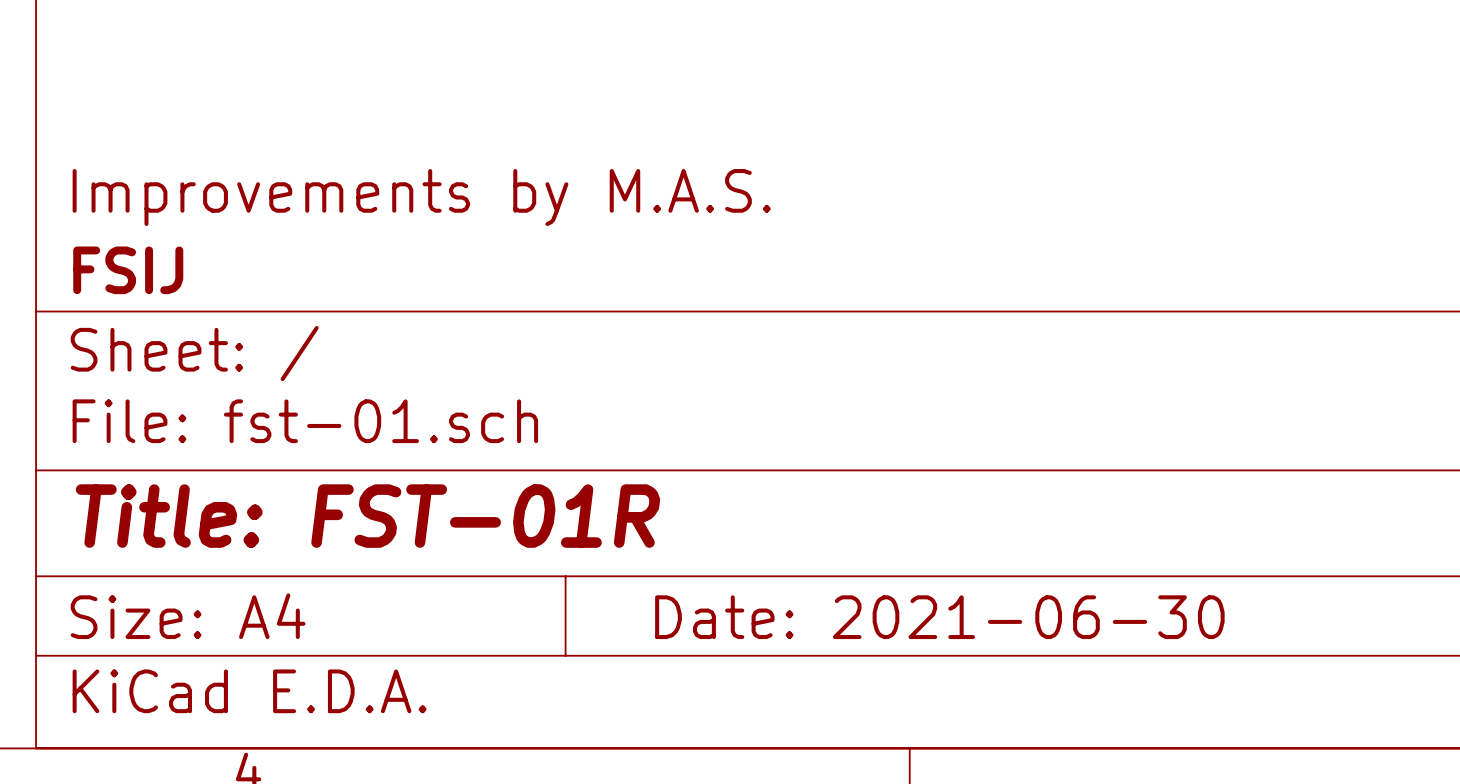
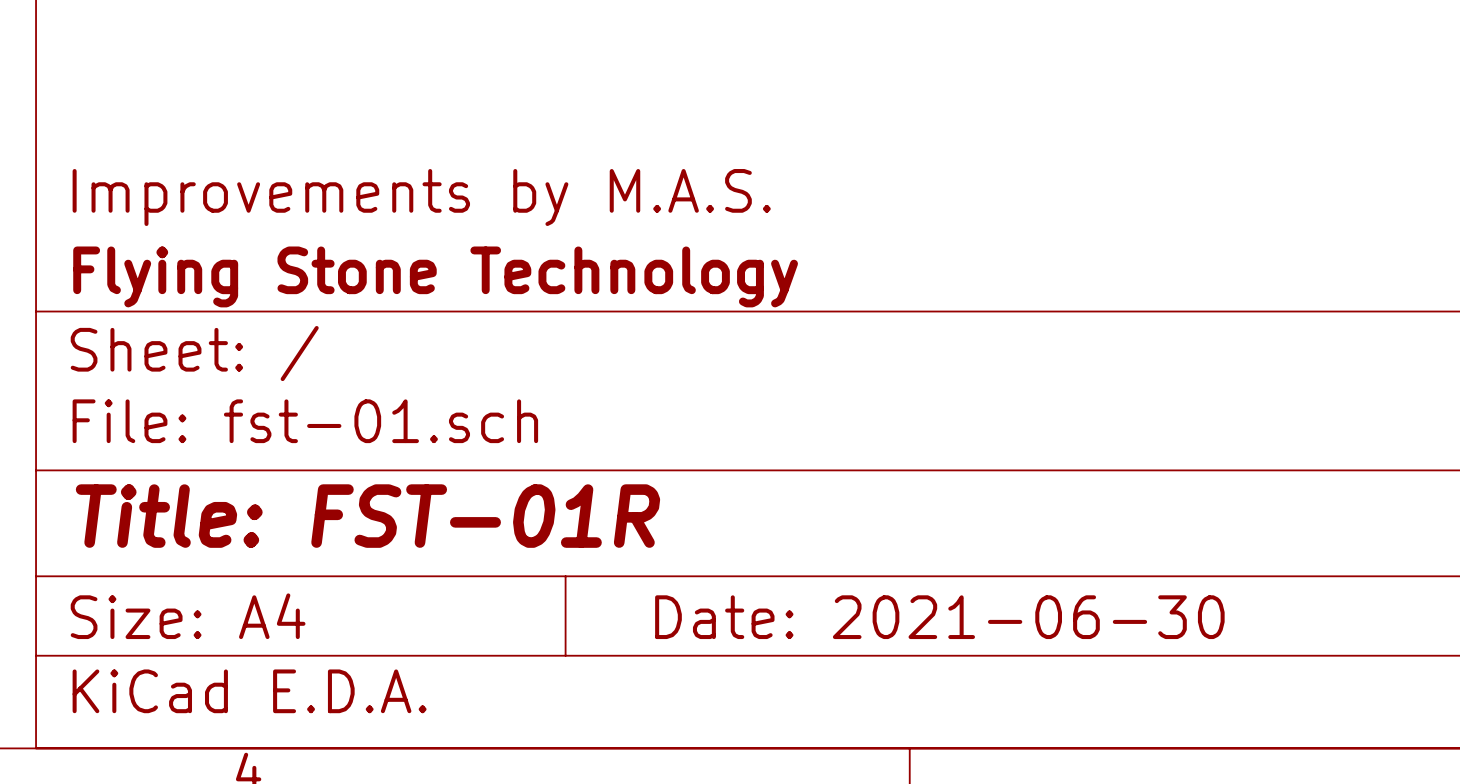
title block: FSIJ (128, 270) -> Flying Stone Technology (435, 276)

